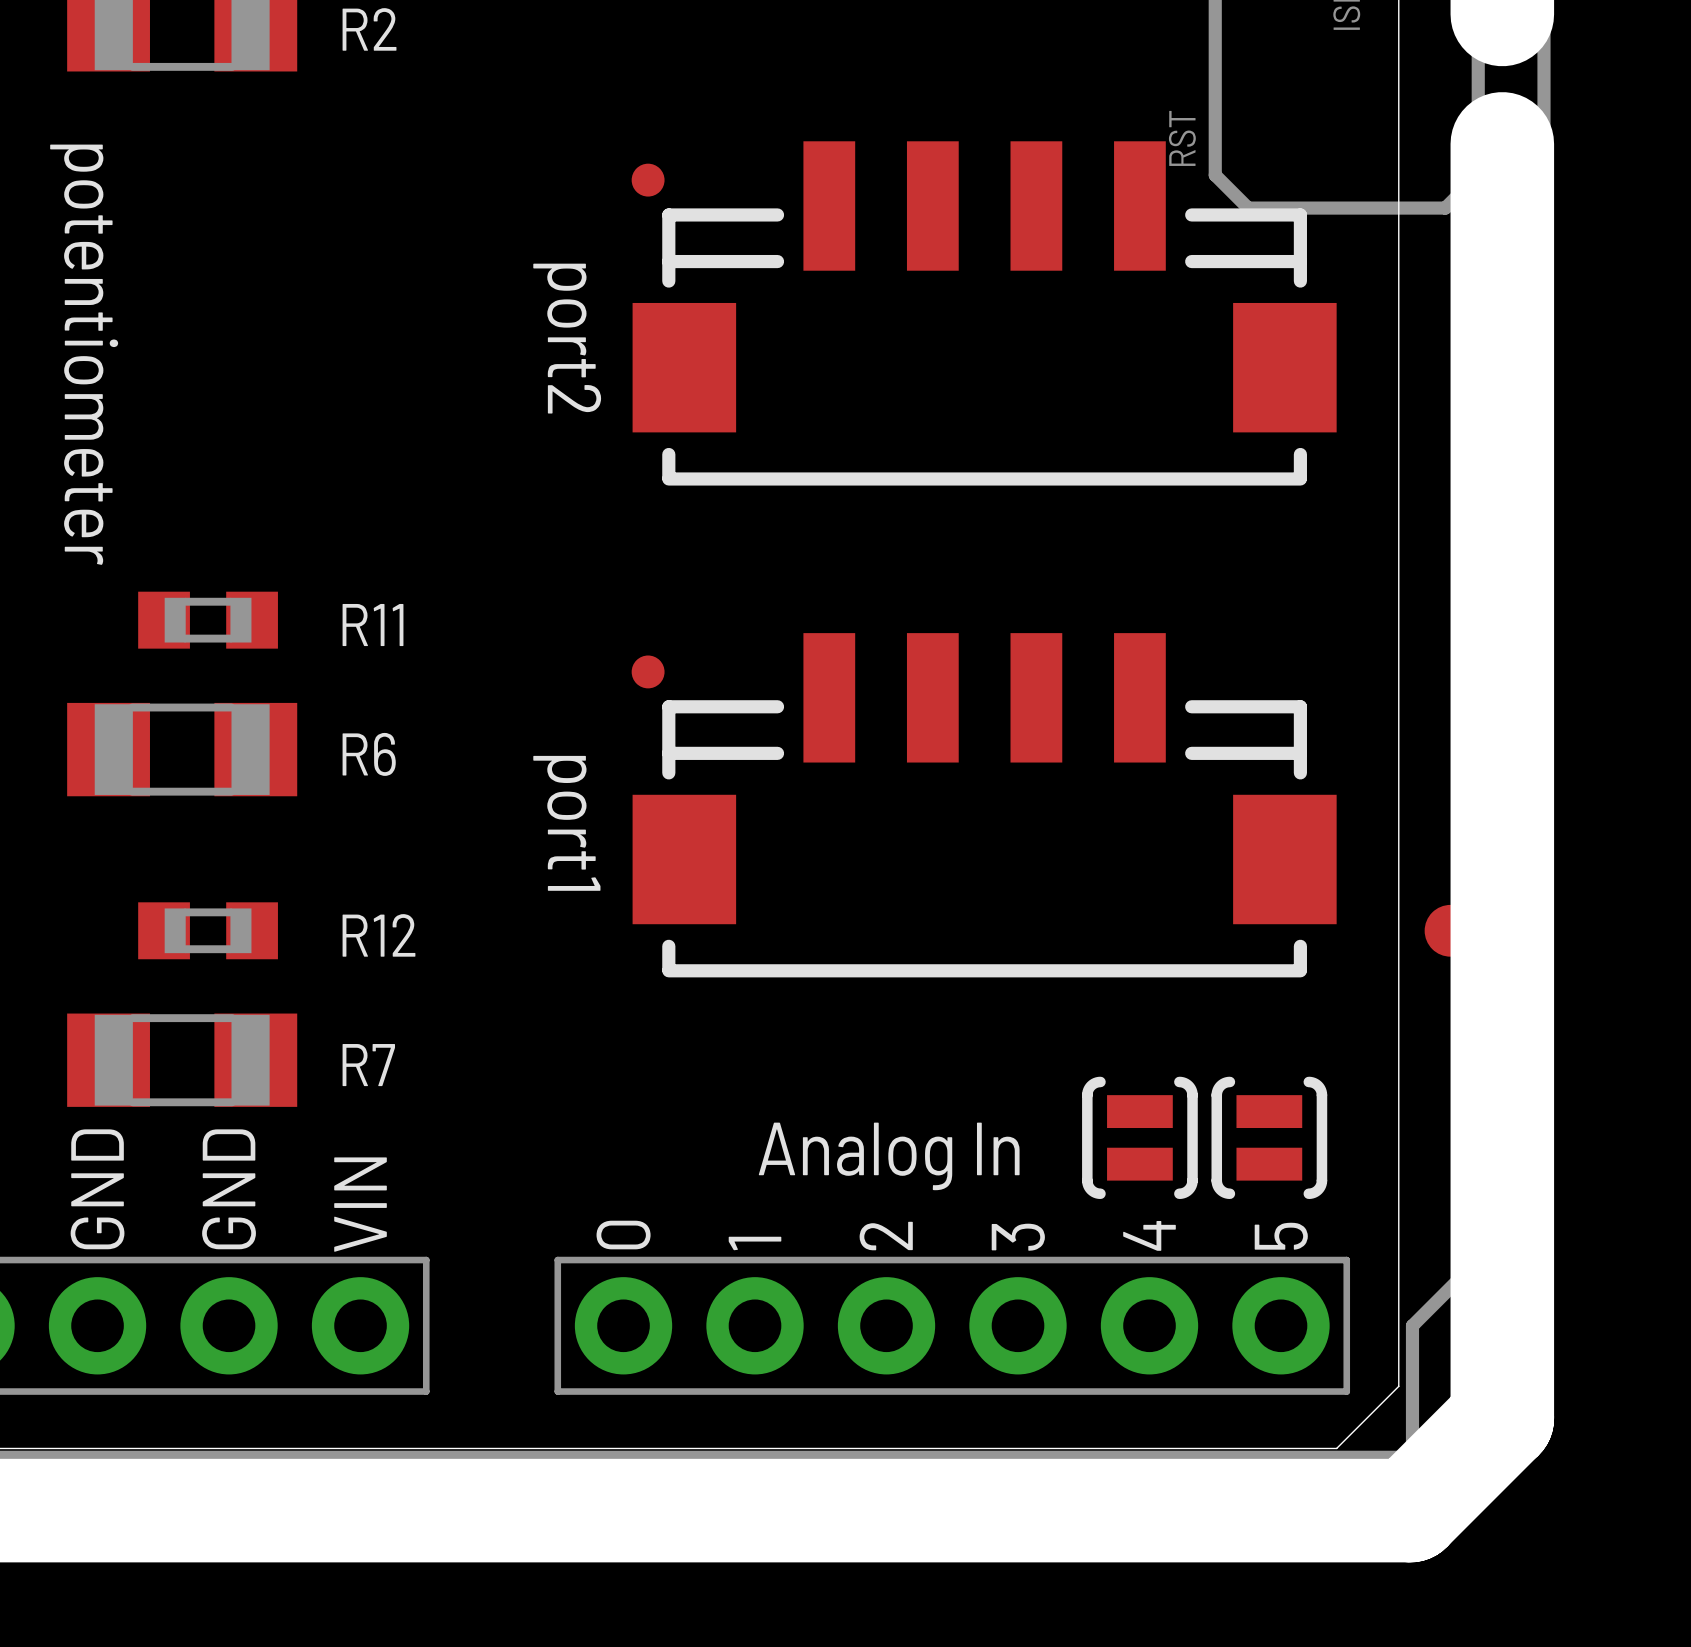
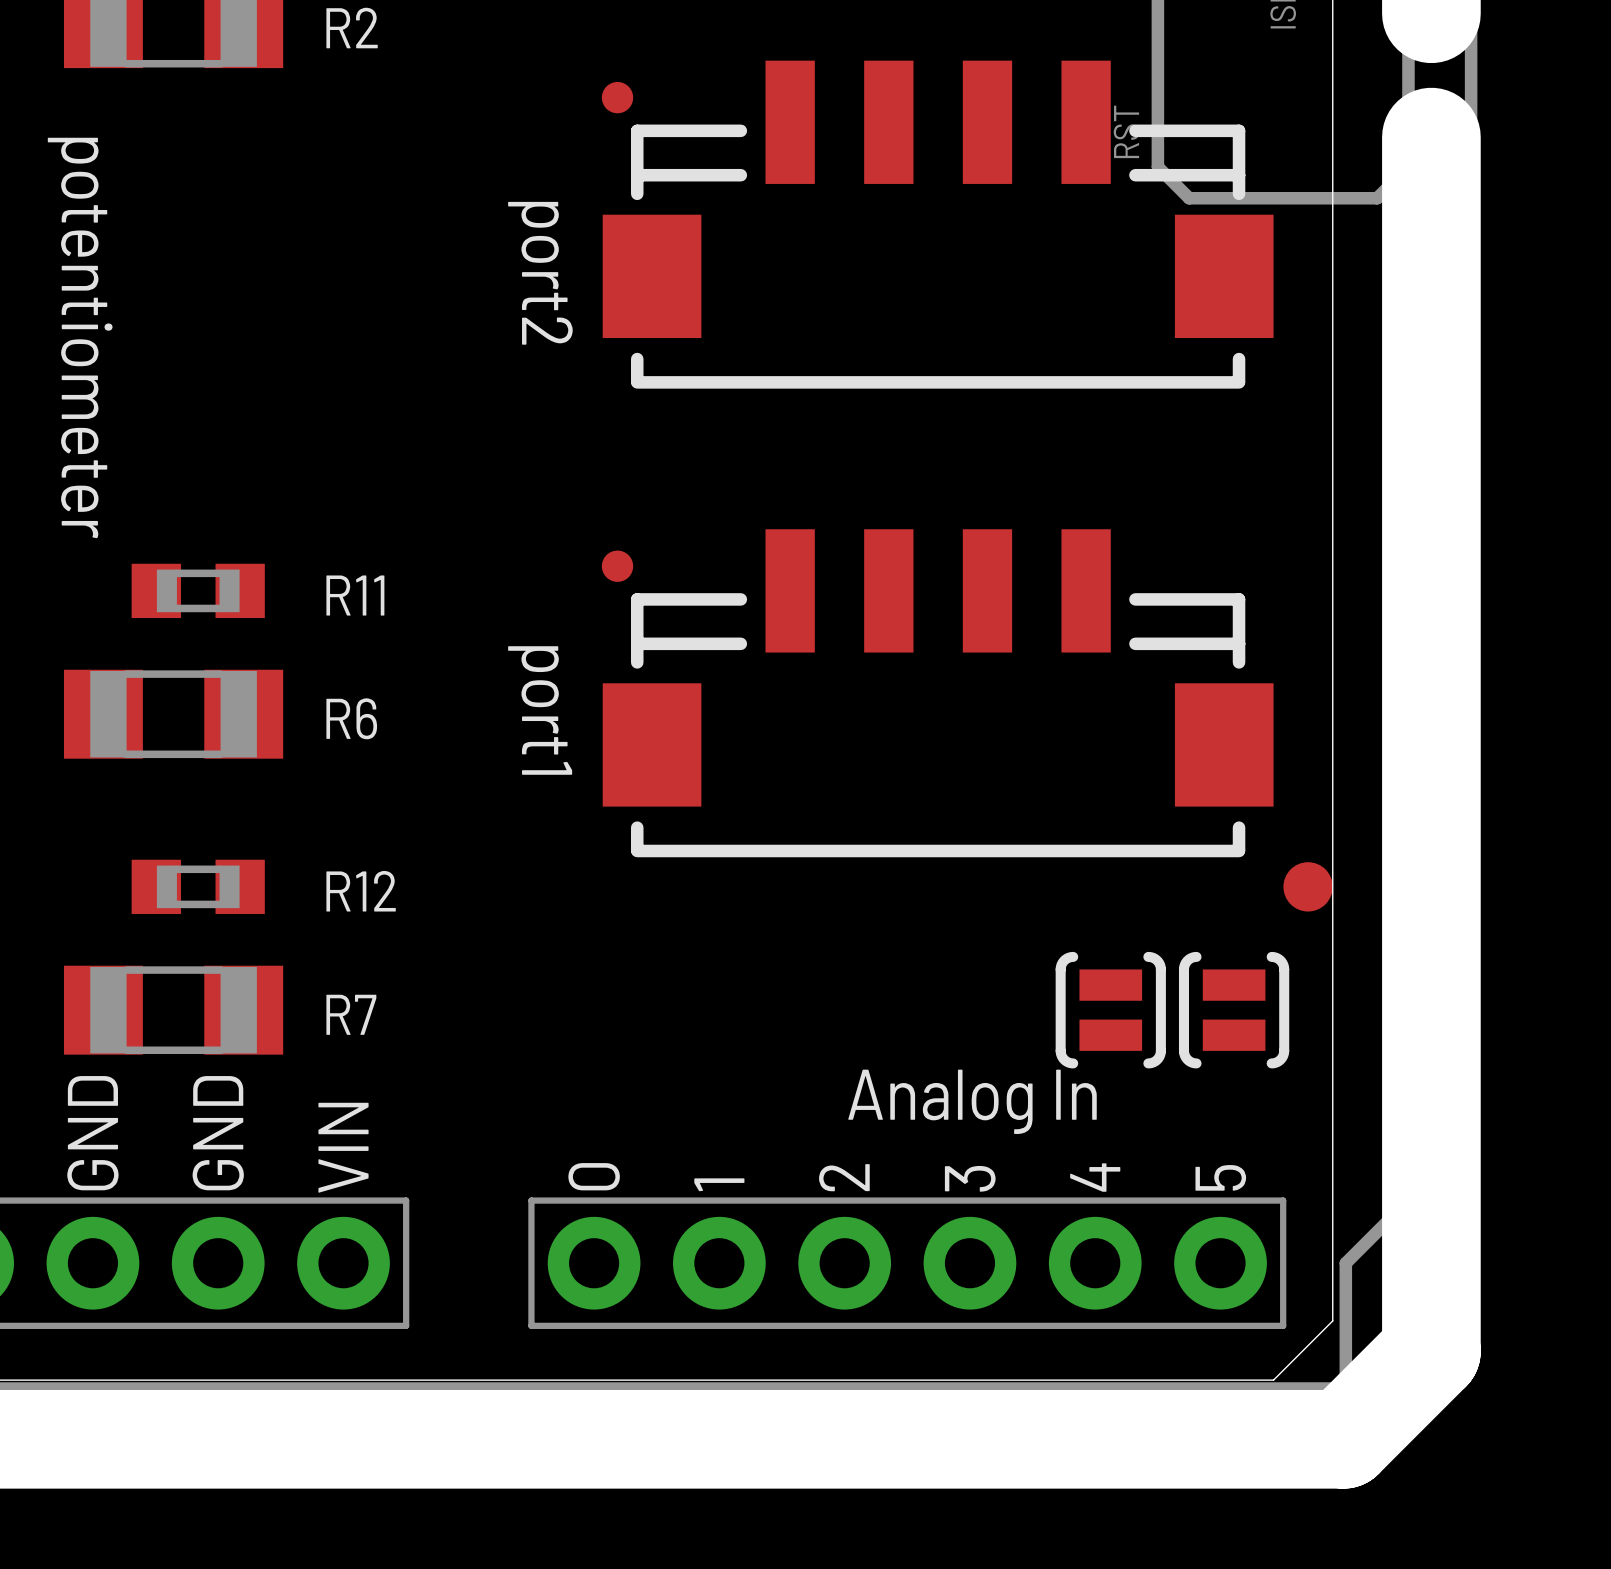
part position: (648, 180) -> (617, 97)
part position: (984, 313) -> (938, 224)
text position: port2 (567, 338) -> port2 (540, 273)
part position: (648, 671) -> (617, 566)
part position: (984, 805) -> (938, 693)
text position: port1 (566, 823) -> port1 (540, 710)
part position: (1450, 930) -> (1308, 886)
part: none -> (1110, 1010)
part: none -> (1234, 1010)
part: (1139, 1137) -> none
part: (1269, 1137) -> none
part text position: Analog In (889, 1156) -> Analog In (972, 1101)

